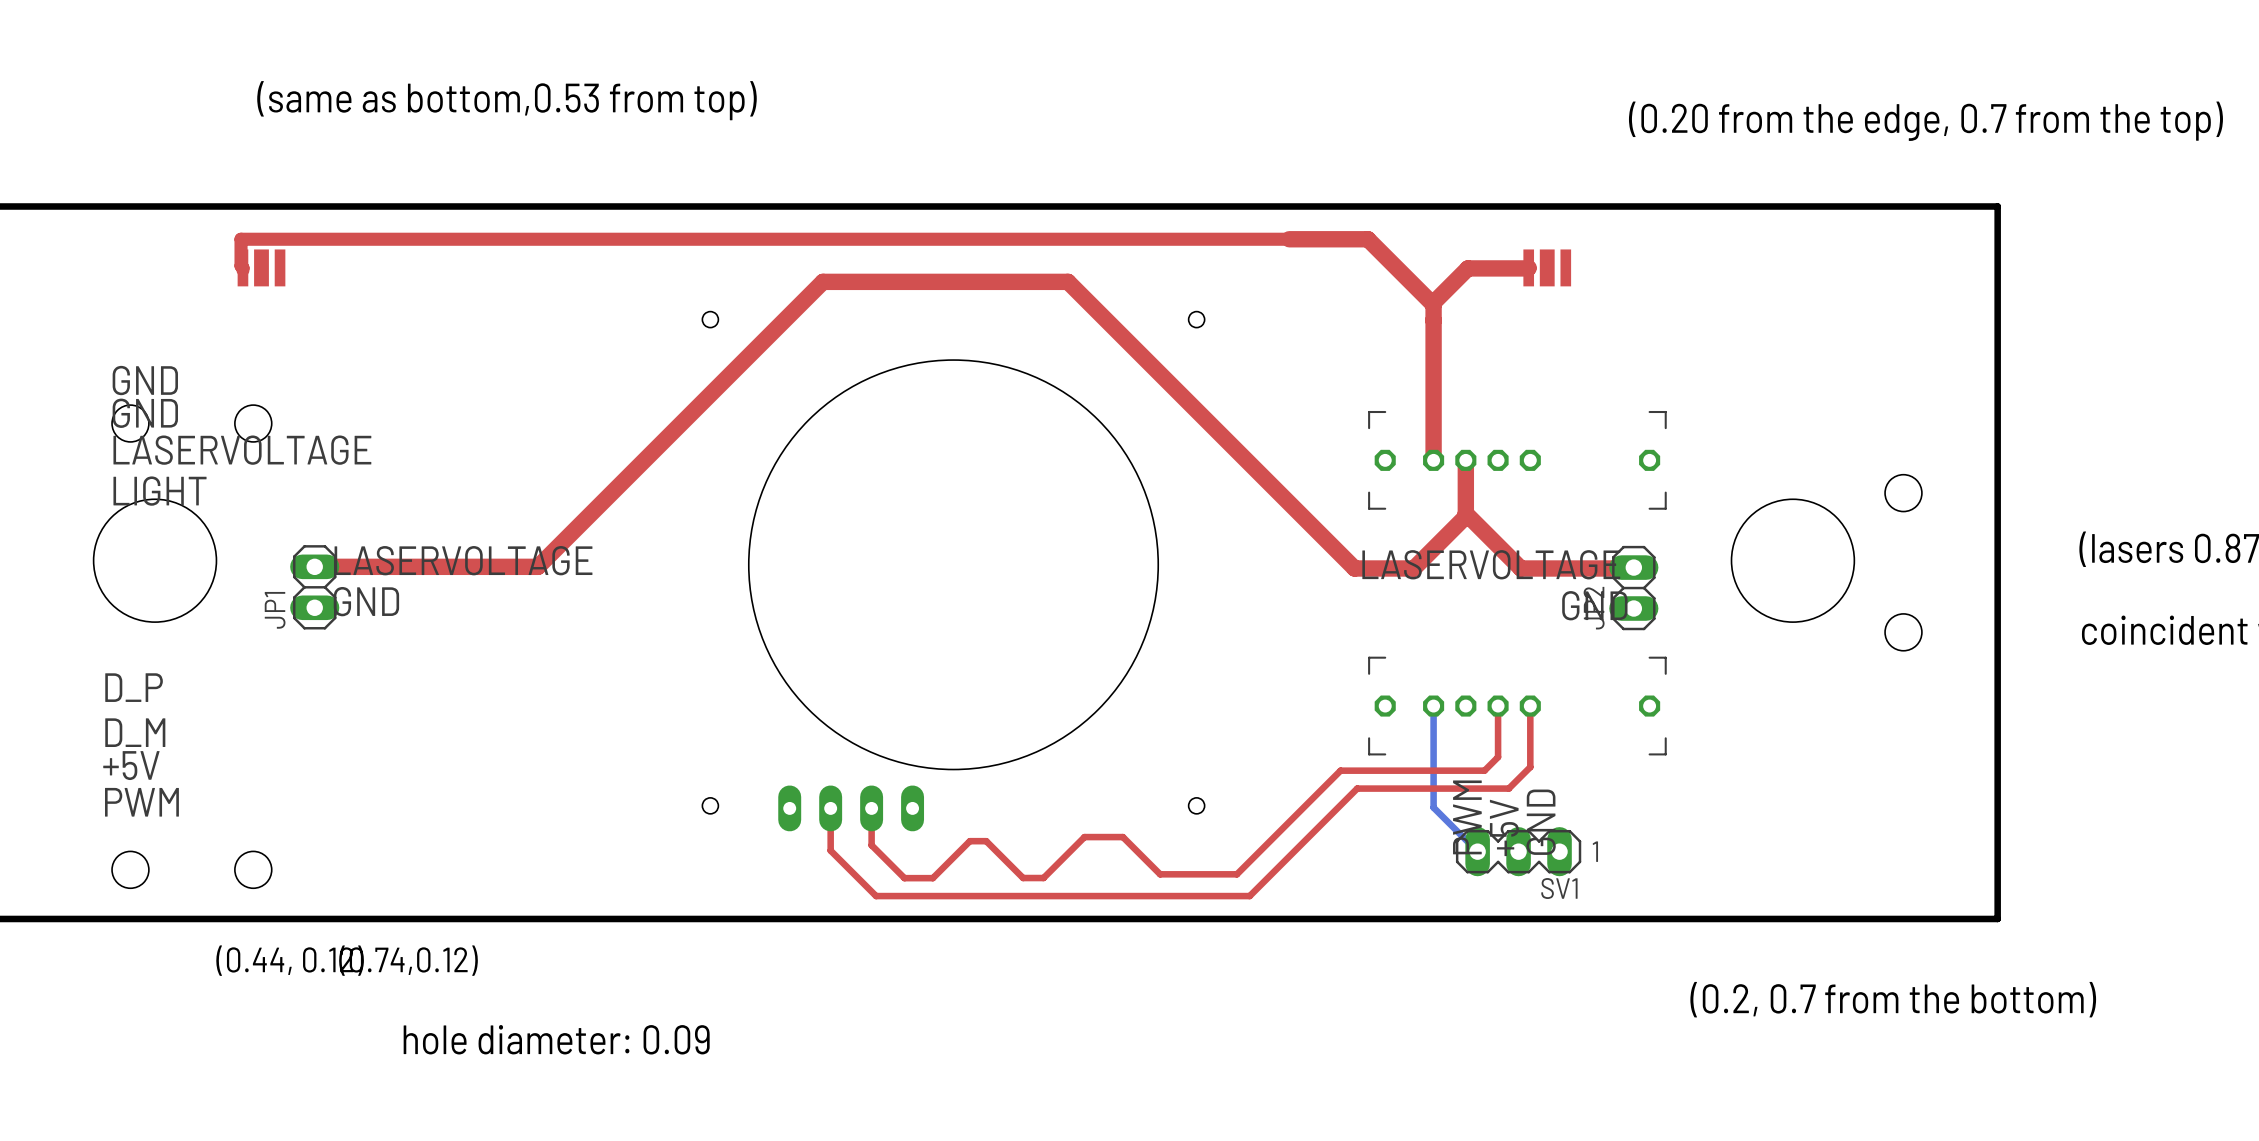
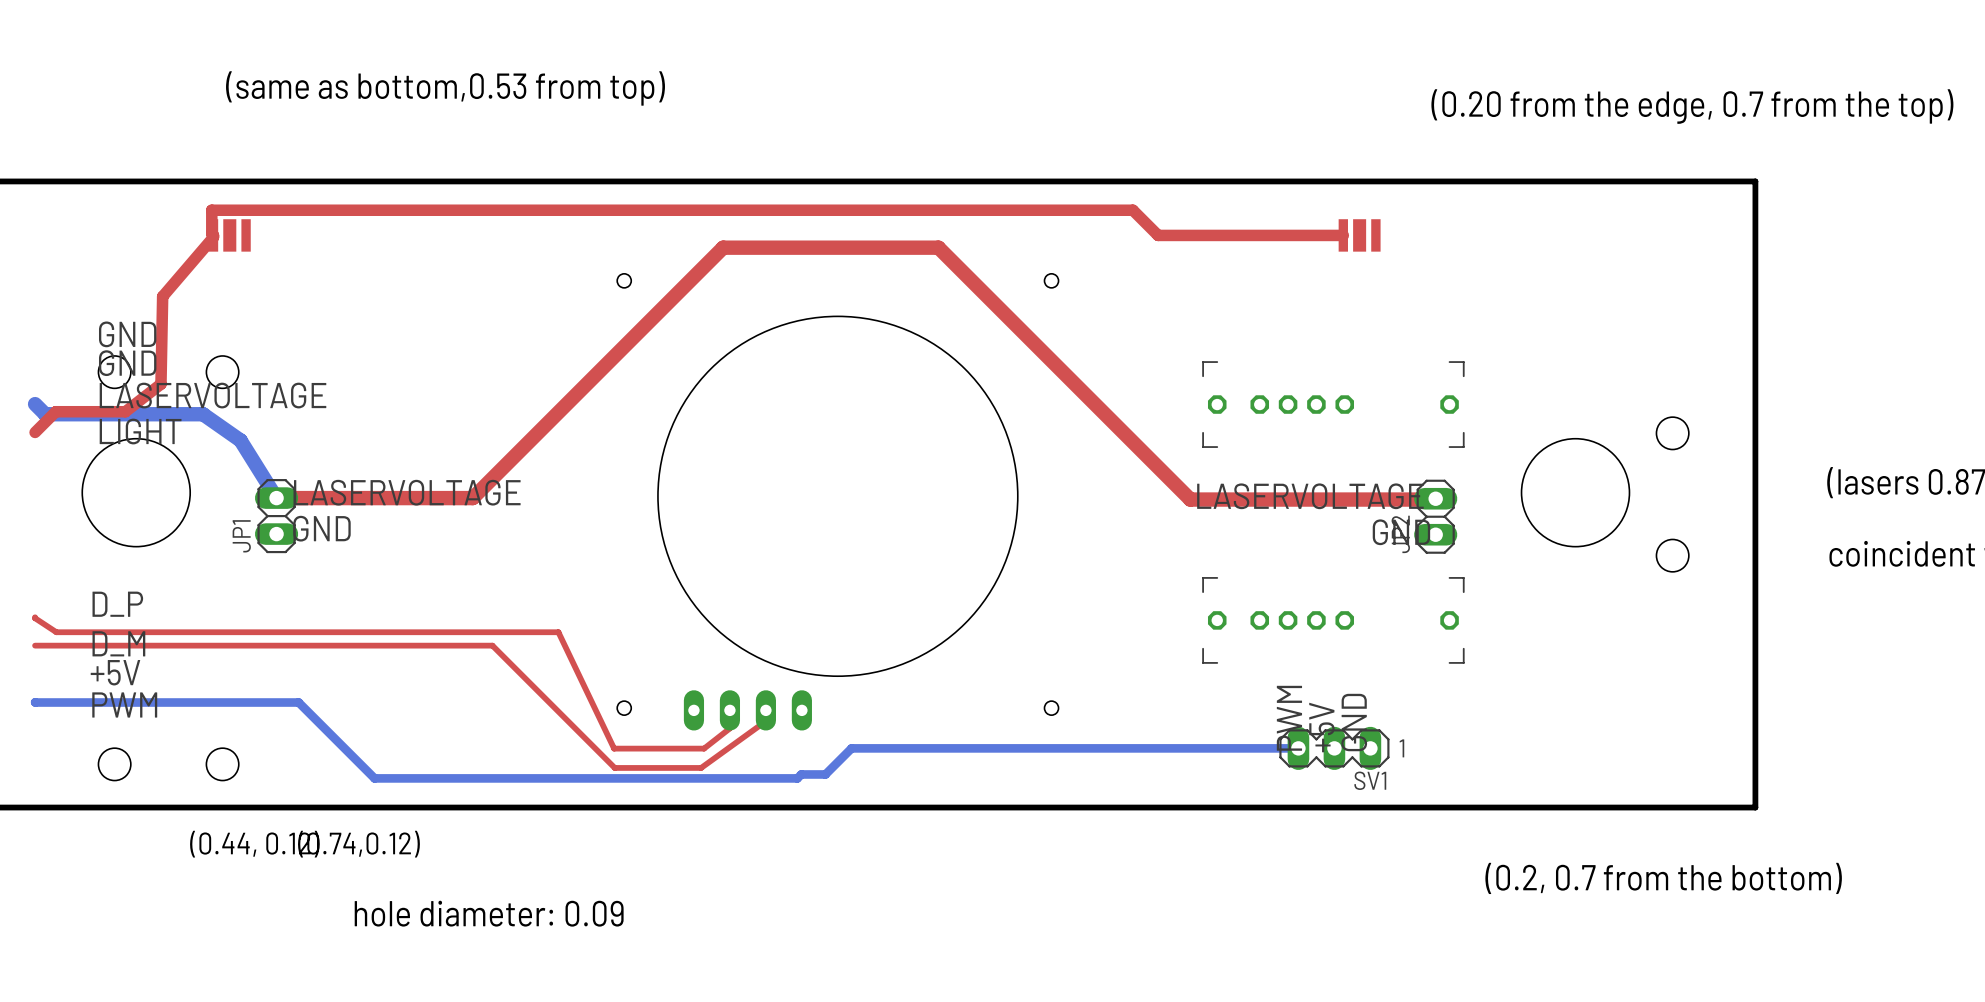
top track: (1289, 239) (1367, 239) (1433, 304) -> (1132, 210) (1158, 235) (1343, 235)
top track: (1528, 267) (1467, 268) (1433, 302) (1433, 460) -> none
top track: none -> (213, 237) (162, 296) (160, 384) (125, 411) (55, 411) (35, 432)
bottom track: none -> (35, 404) (45, 414) (203, 414) (240, 440) (276, 498)
top track: (1465, 460) (1465, 516) (1413, 568) -> none
top track: (1465, 513) (1520, 568) -> (1242, 499) (1336, 499)
bottom track: (1433, 706) (1433, 807) (1477, 851) -> (35, 702) (298, 702) (374, 778) (797, 778) (801, 774) (825, 774) (851, 748) (1298, 748)
top track: (1498, 706) (1498, 757) (1484, 770) (1340, 770) (1236, 874) (1160, 874) (1122, 837) (1084, 837) (1043, 878) (1023, 878) (986, 841) (969, 841) (932, 878) (904, 878) (871, 845) (871, 820) -> (35, 645) (492, 645) (614, 767) (701, 767) (765, 721)
top track: (1530, 706) (1530, 767) (1508, 788) (1357, 788) (1249, 896) (876, 896) (830, 850) (830, 828) -> (35, 617) (56, 632) (558, 632) (614, 748) (704, 748) (729, 728)

